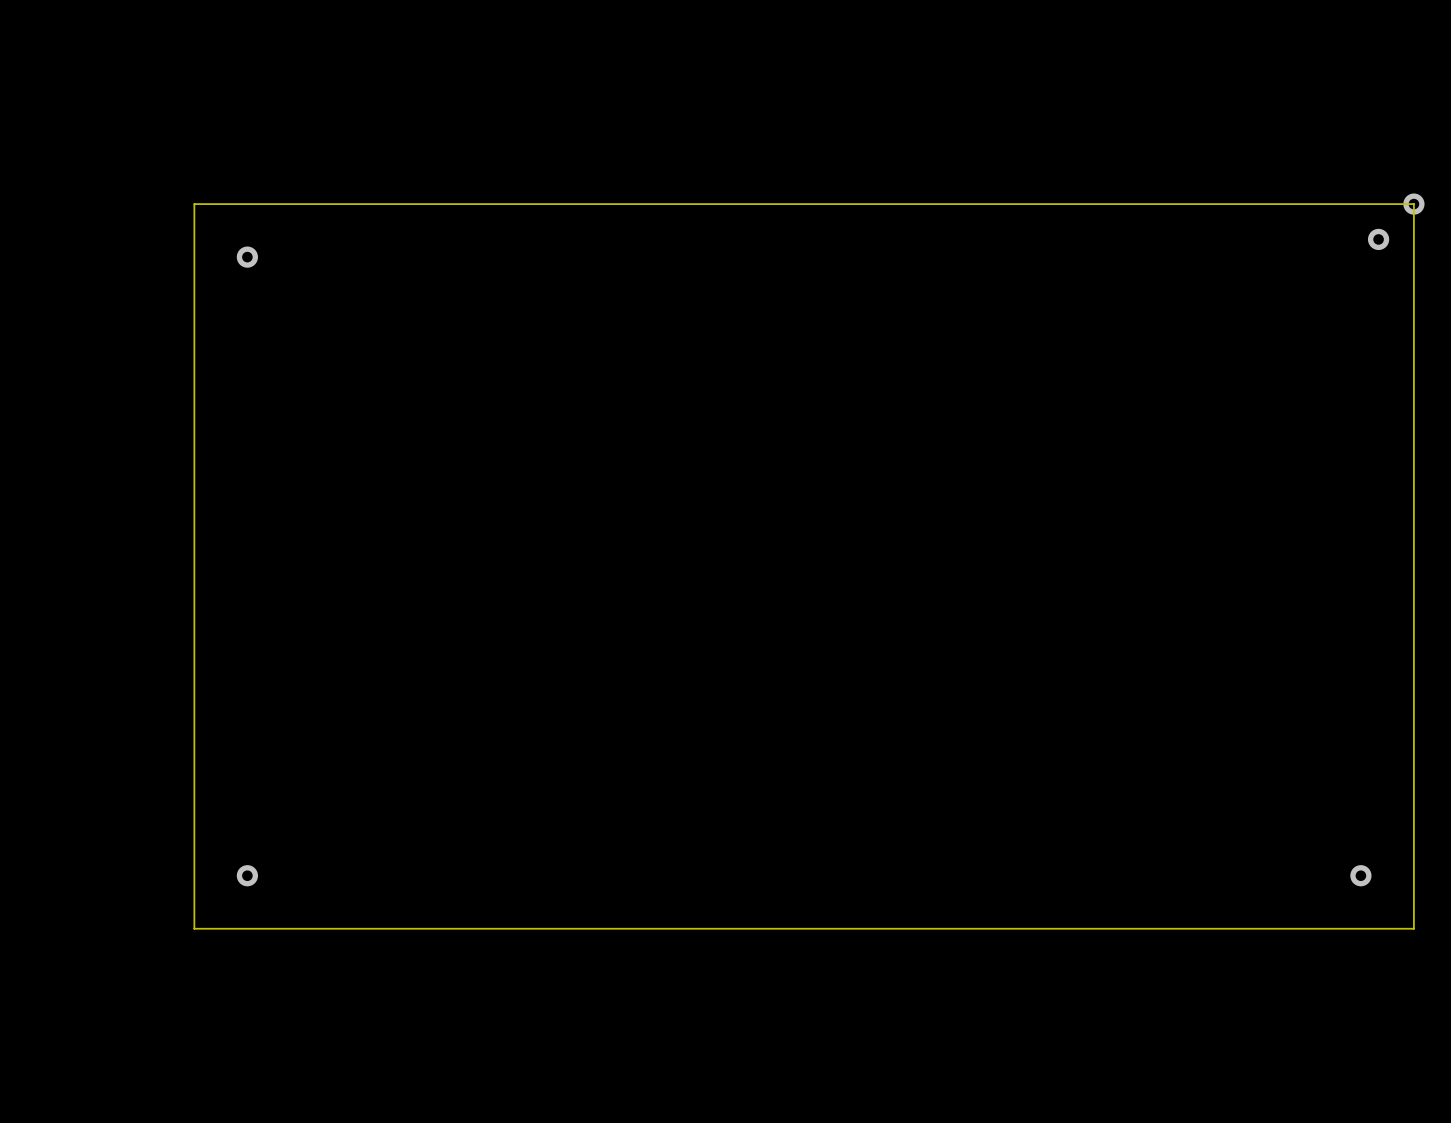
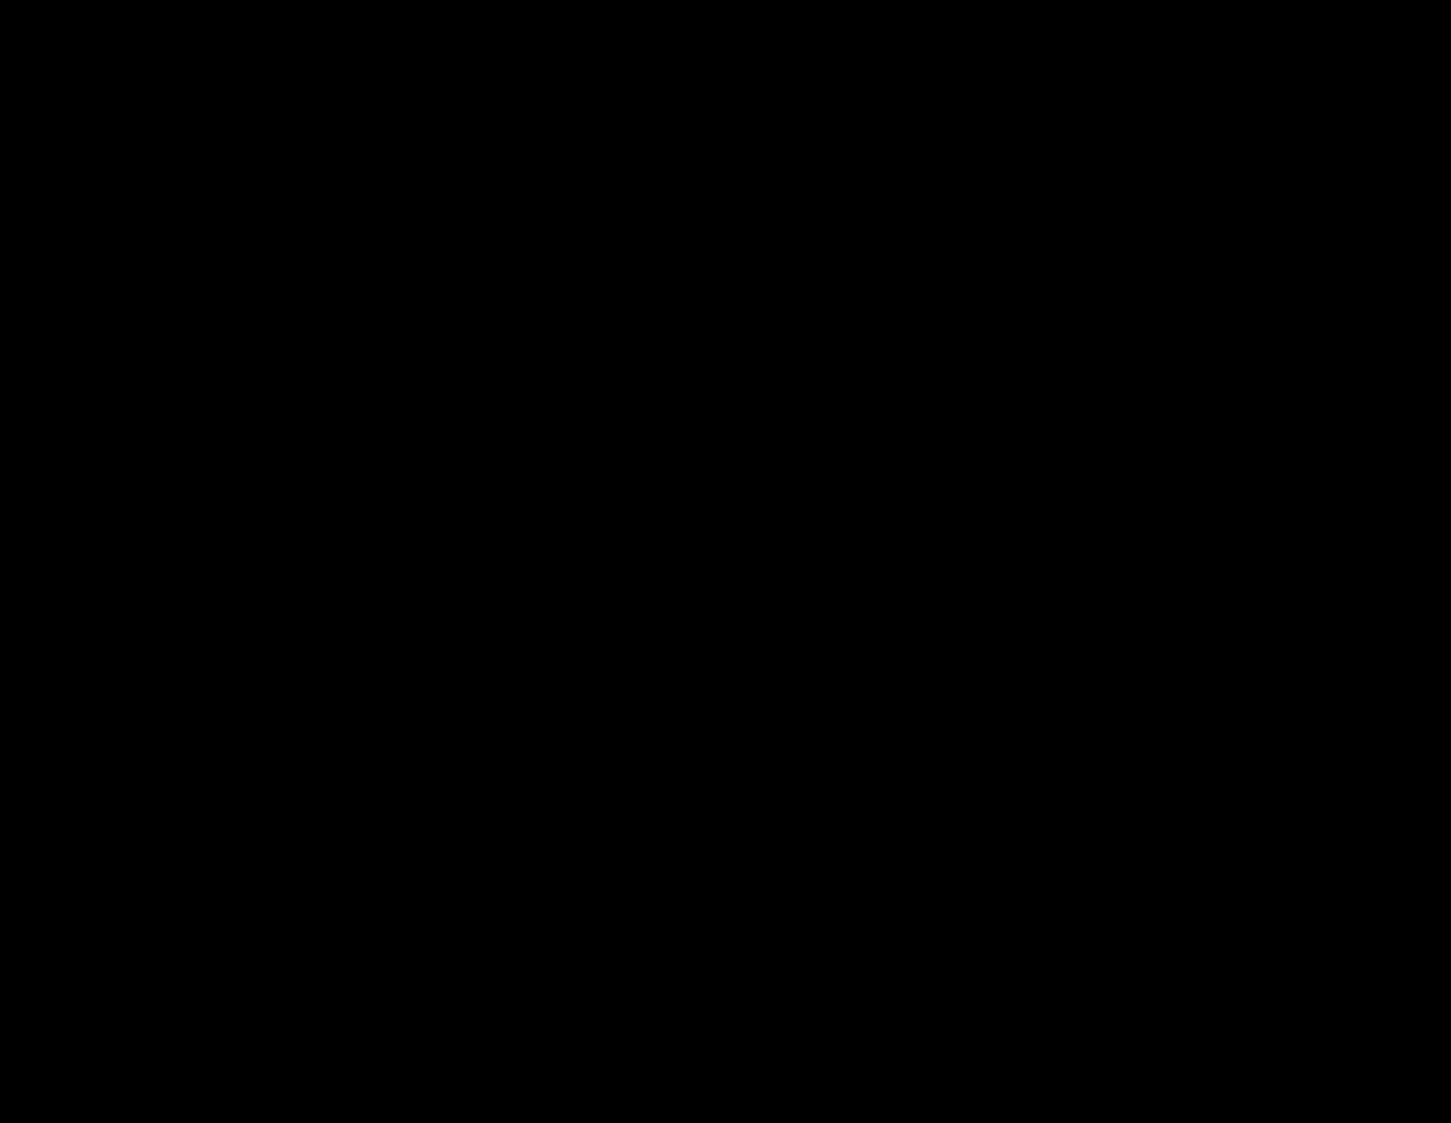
board edge: (1413, 204) (194, 204) (194, 928) (1413, 928) (1413, 204) -> none
via: (1413, 204) -> none
via: (1378, 239) -> none
via: (247, 257) -> none
via: (247, 875) -> none
via: (1360, 875) -> none

